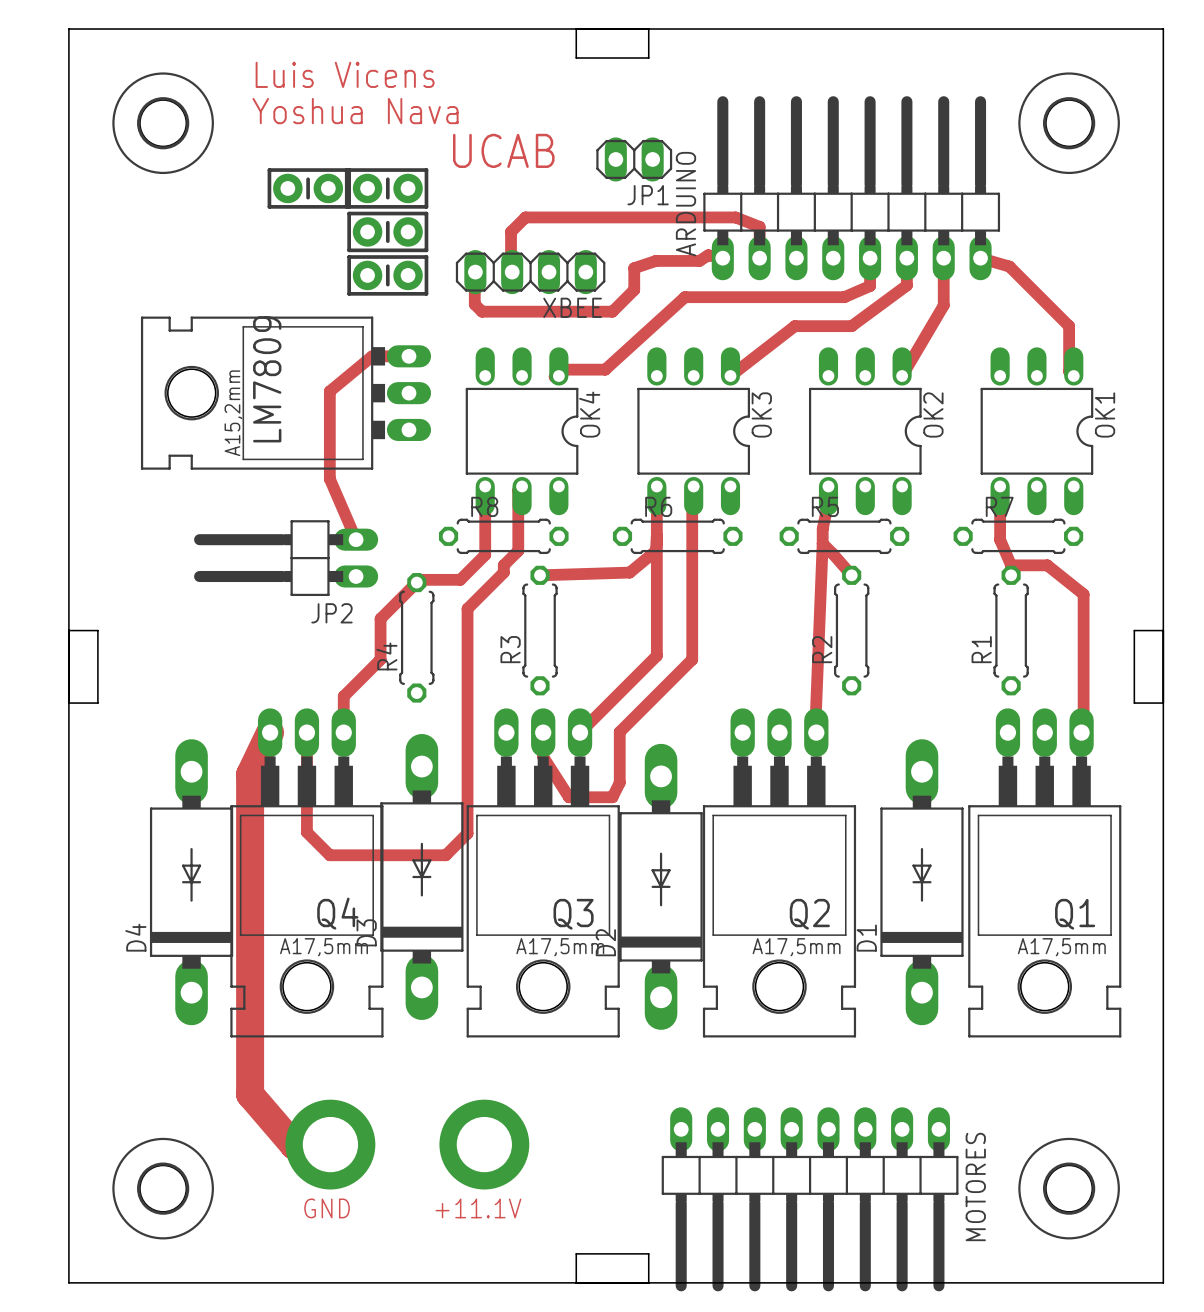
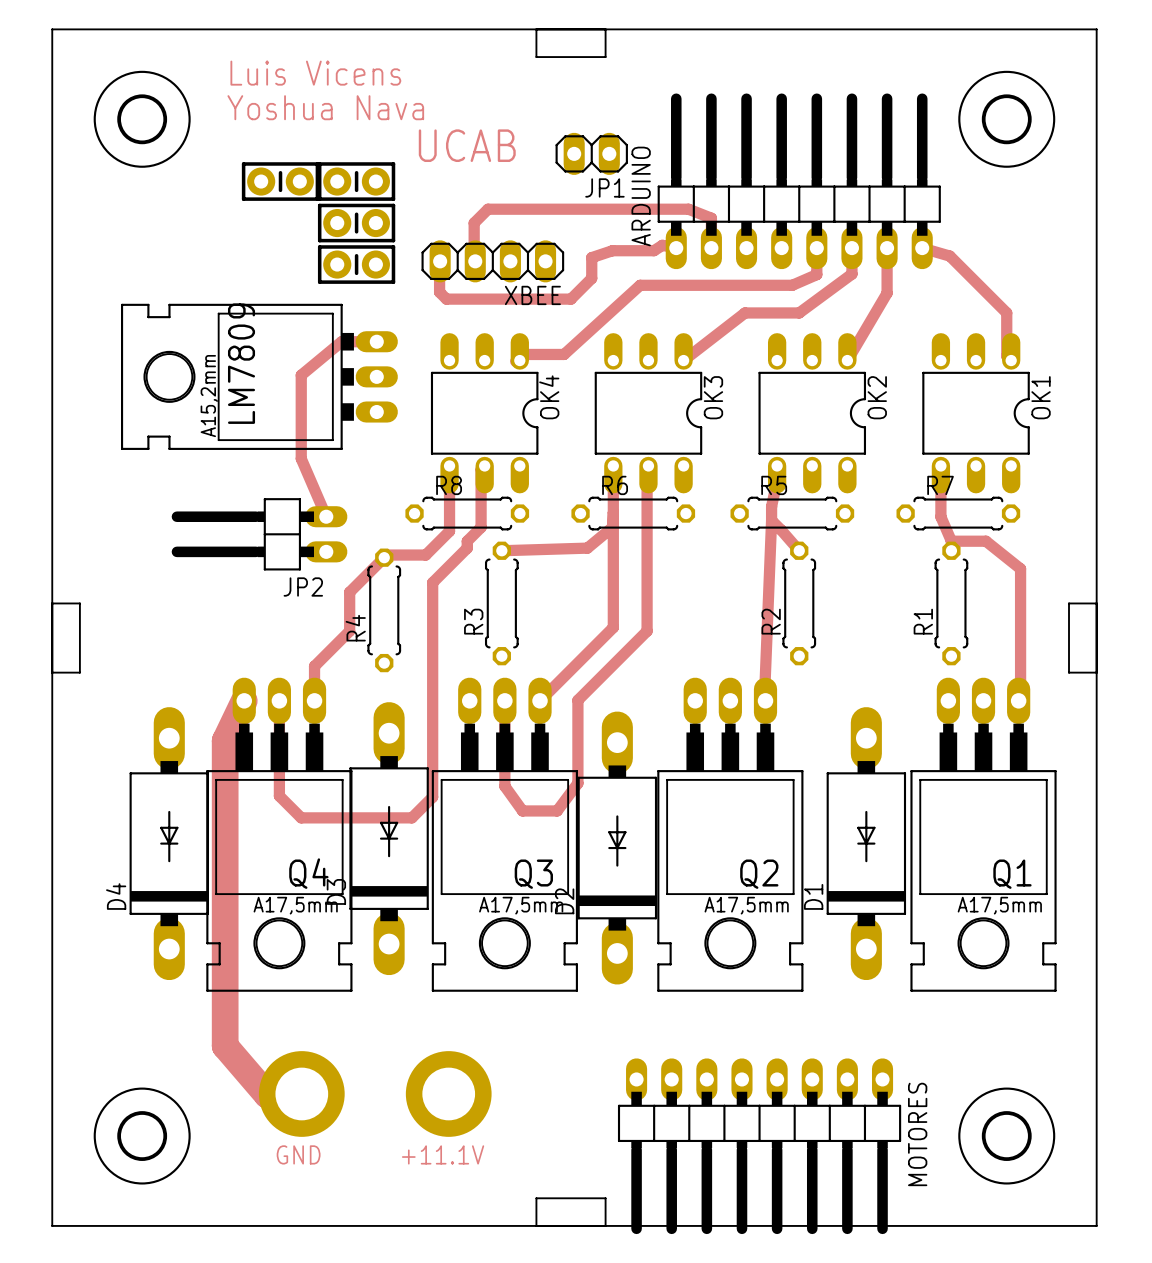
track: (543, 756) (569, 797) (612, 797) (619, 782) -> (504, 724) (504, 786) (522, 810) (557, 810) (577, 783) (577, 748)

